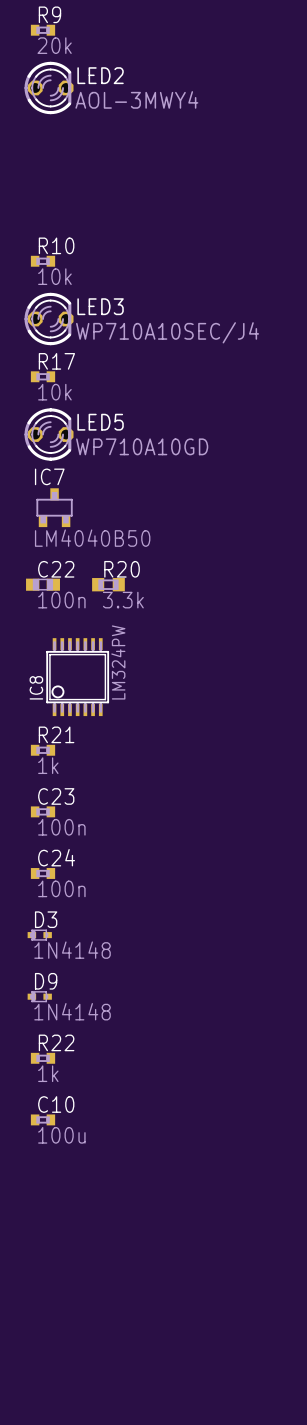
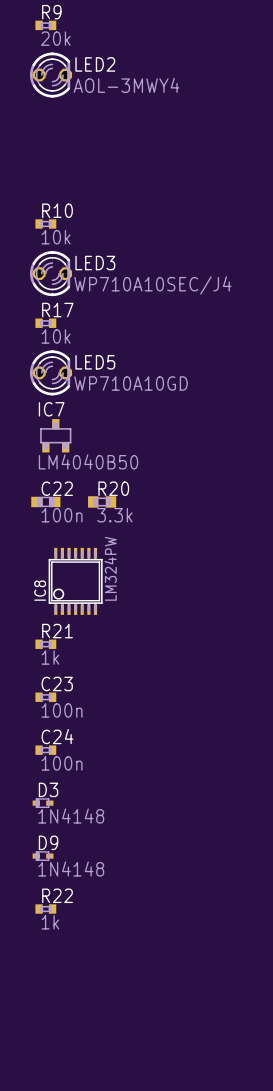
C10: 100u (43, 1119) -> none

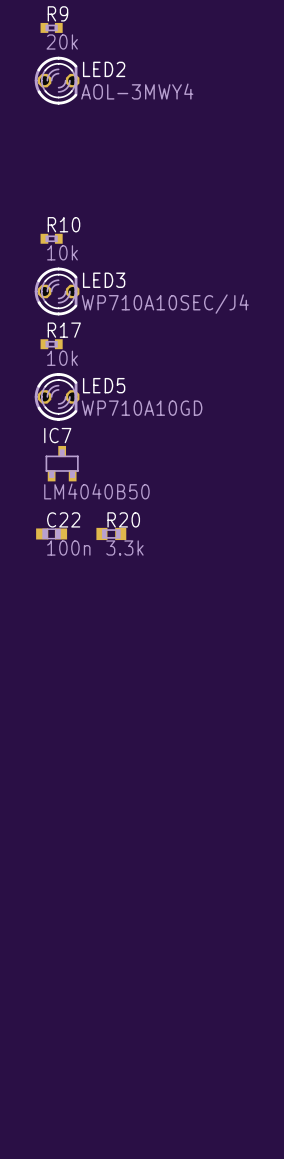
IC8: LM324PW (75, 581) -> none
R21: 1k (45, 644) -> none
C23: 100n (45, 697) -> none
C24: 100n (45, 750) -> none
D3: 1N4148 (43, 803) -> none
D9: 1N4148 (43, 856) -> none
R22: 1k (45, 909) -> none

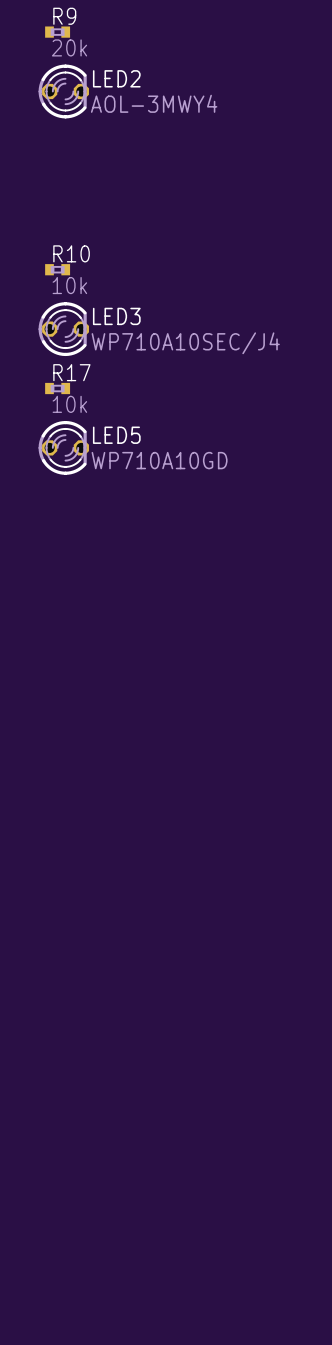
IC7: LM4040B50 (62, 463) -> none
C22: 100n (51, 533) -> none
R20: 3.3k (111, 533) -> none

